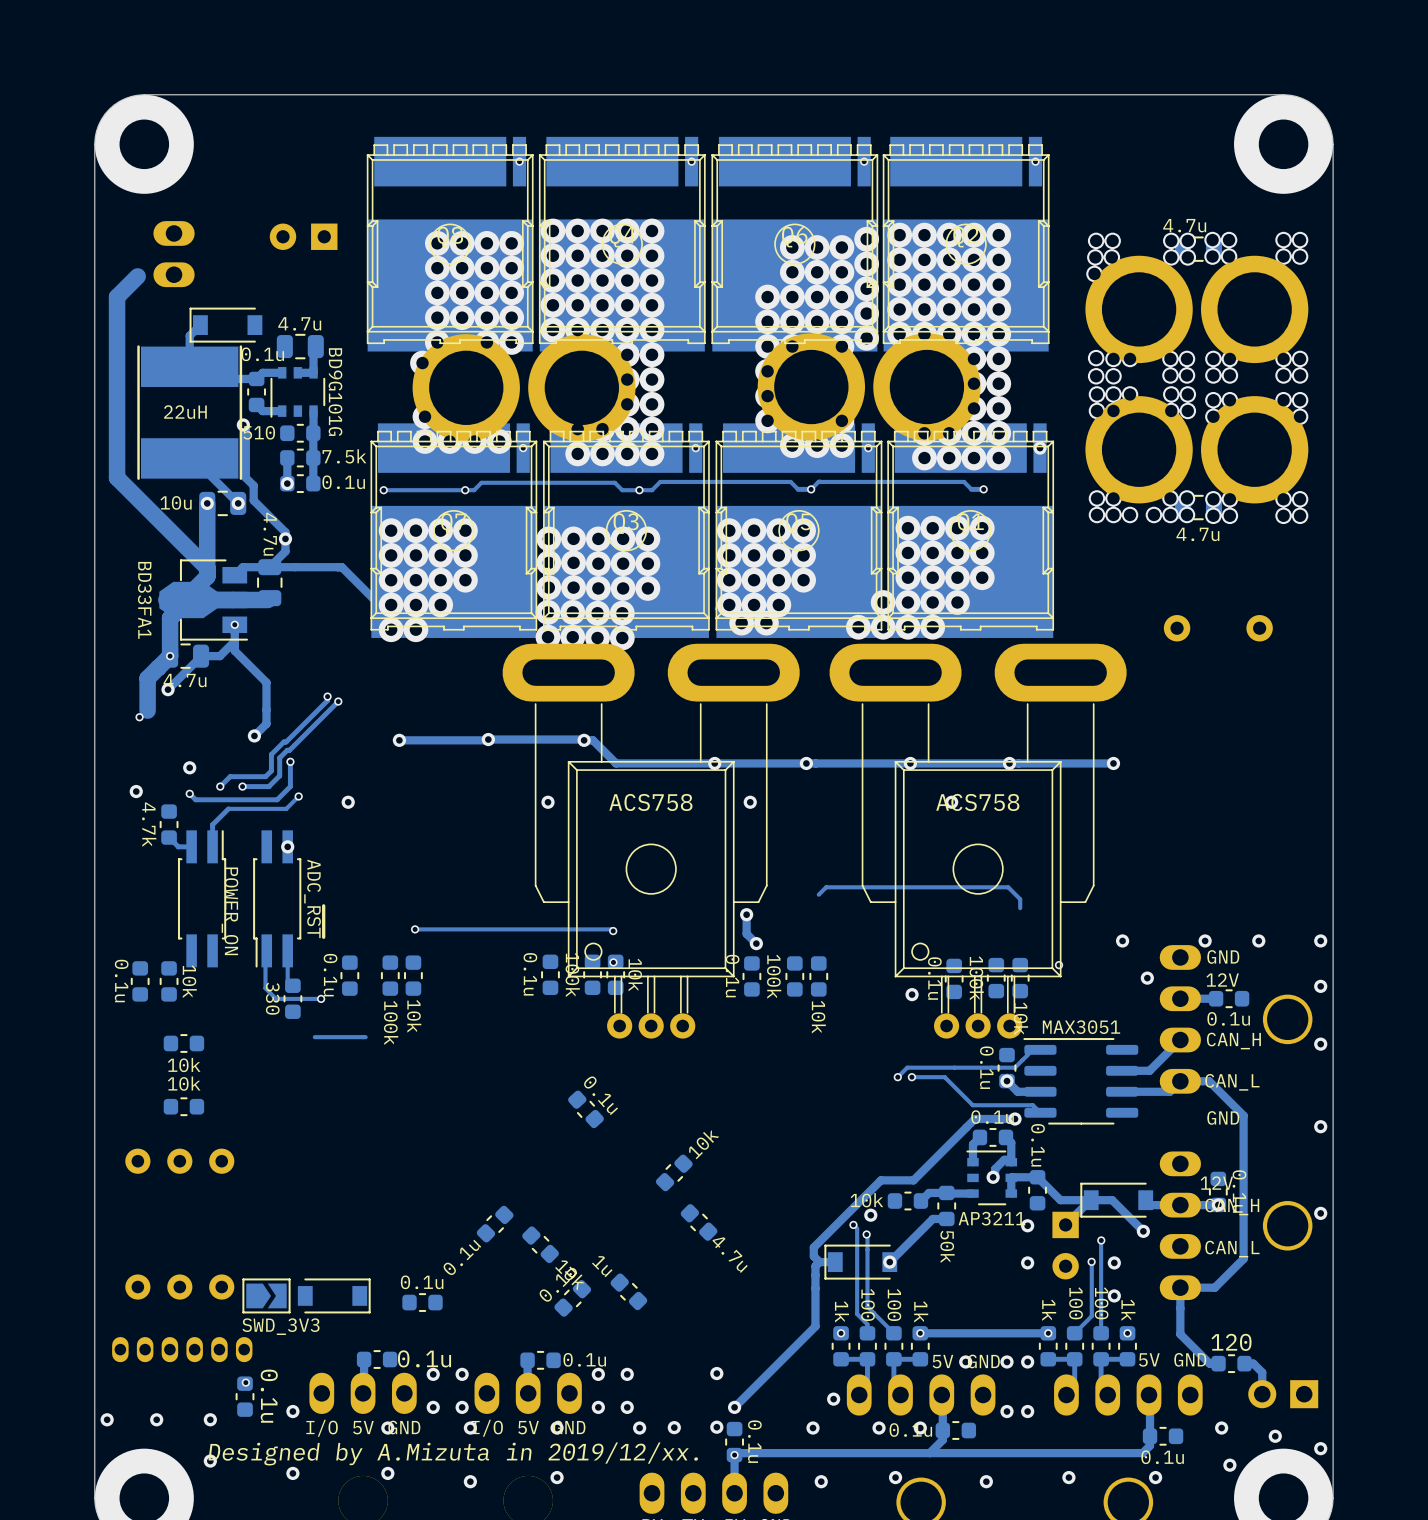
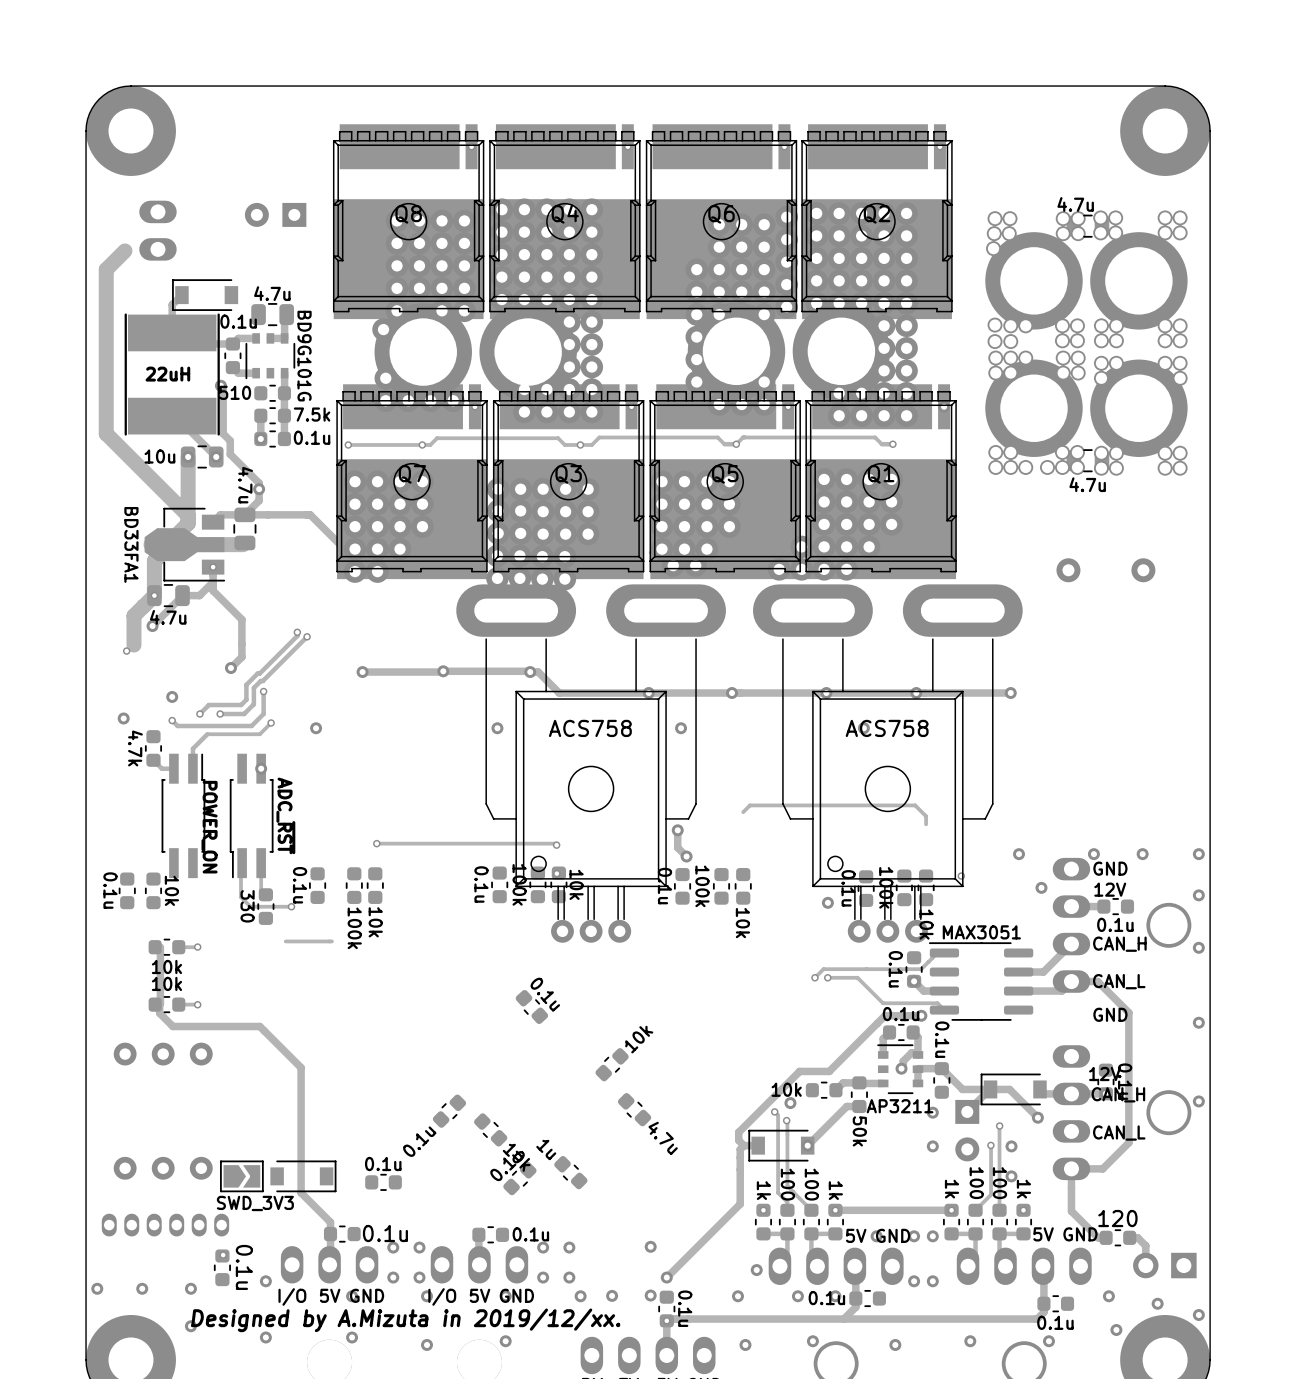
track: none -> (160, 947) (159, 1013) (172, 1026) (259, 1026) (301, 1067) (301, 1192) (330, 1222) (330, 1234)
track: none -> (197, 947) (184, 947)
via: none -> (197, 947)
track: none -> (197, 1004) (183, 1004)
via: none -> (197, 1004)

